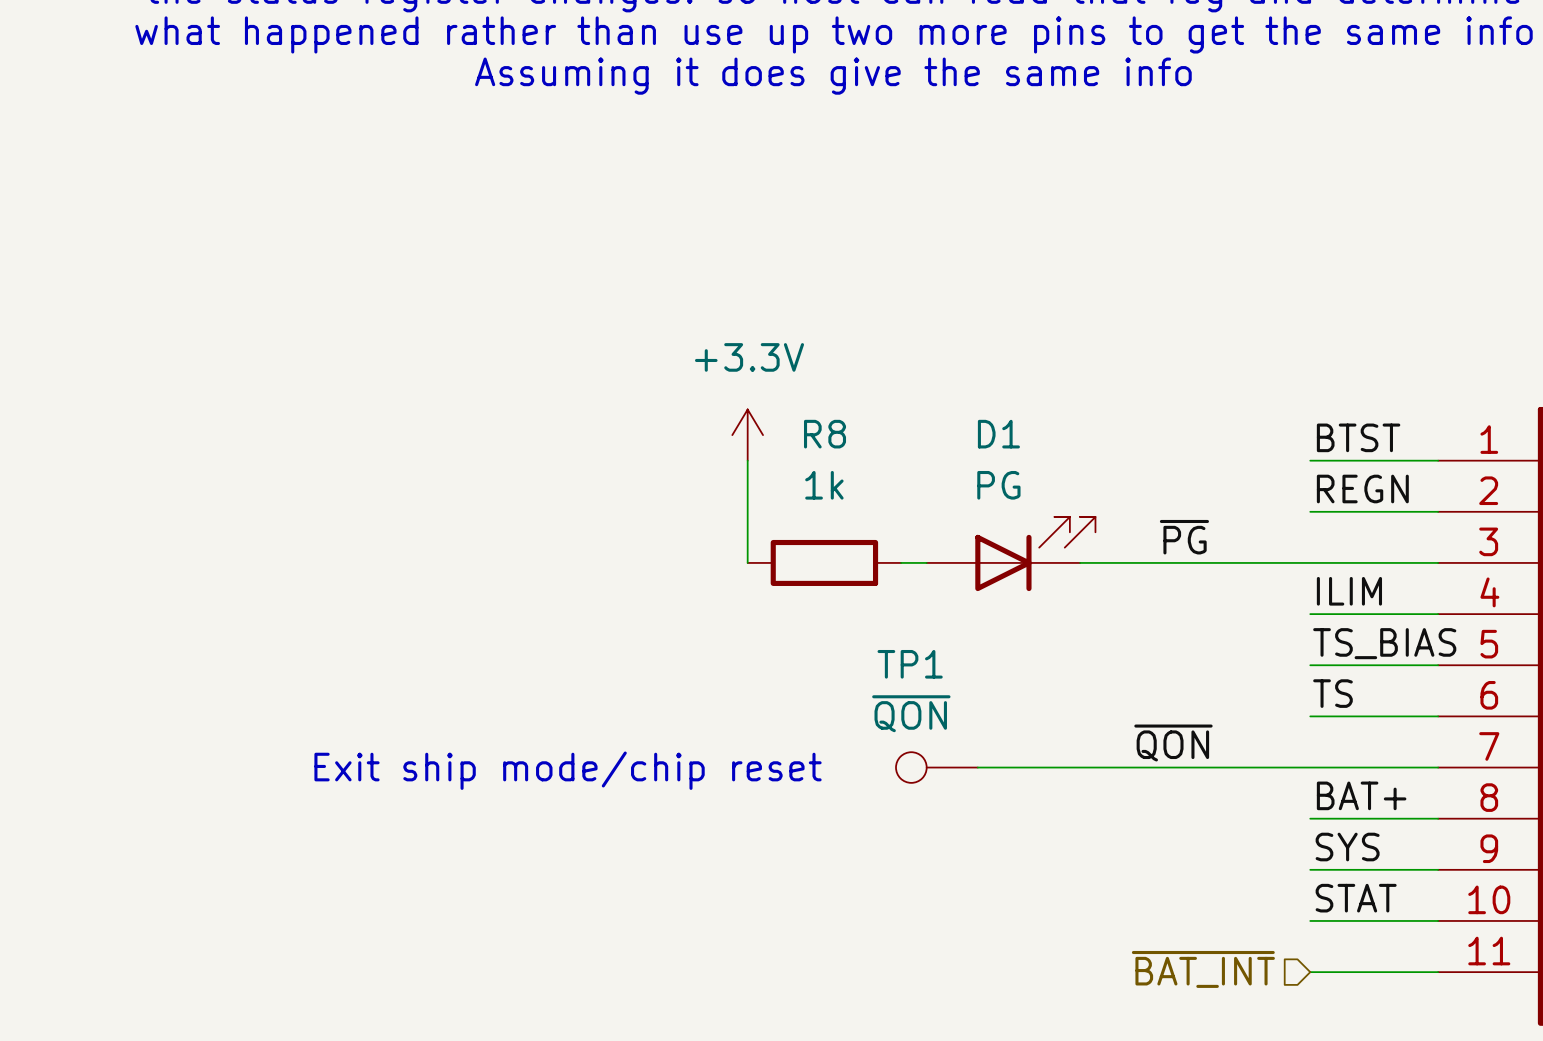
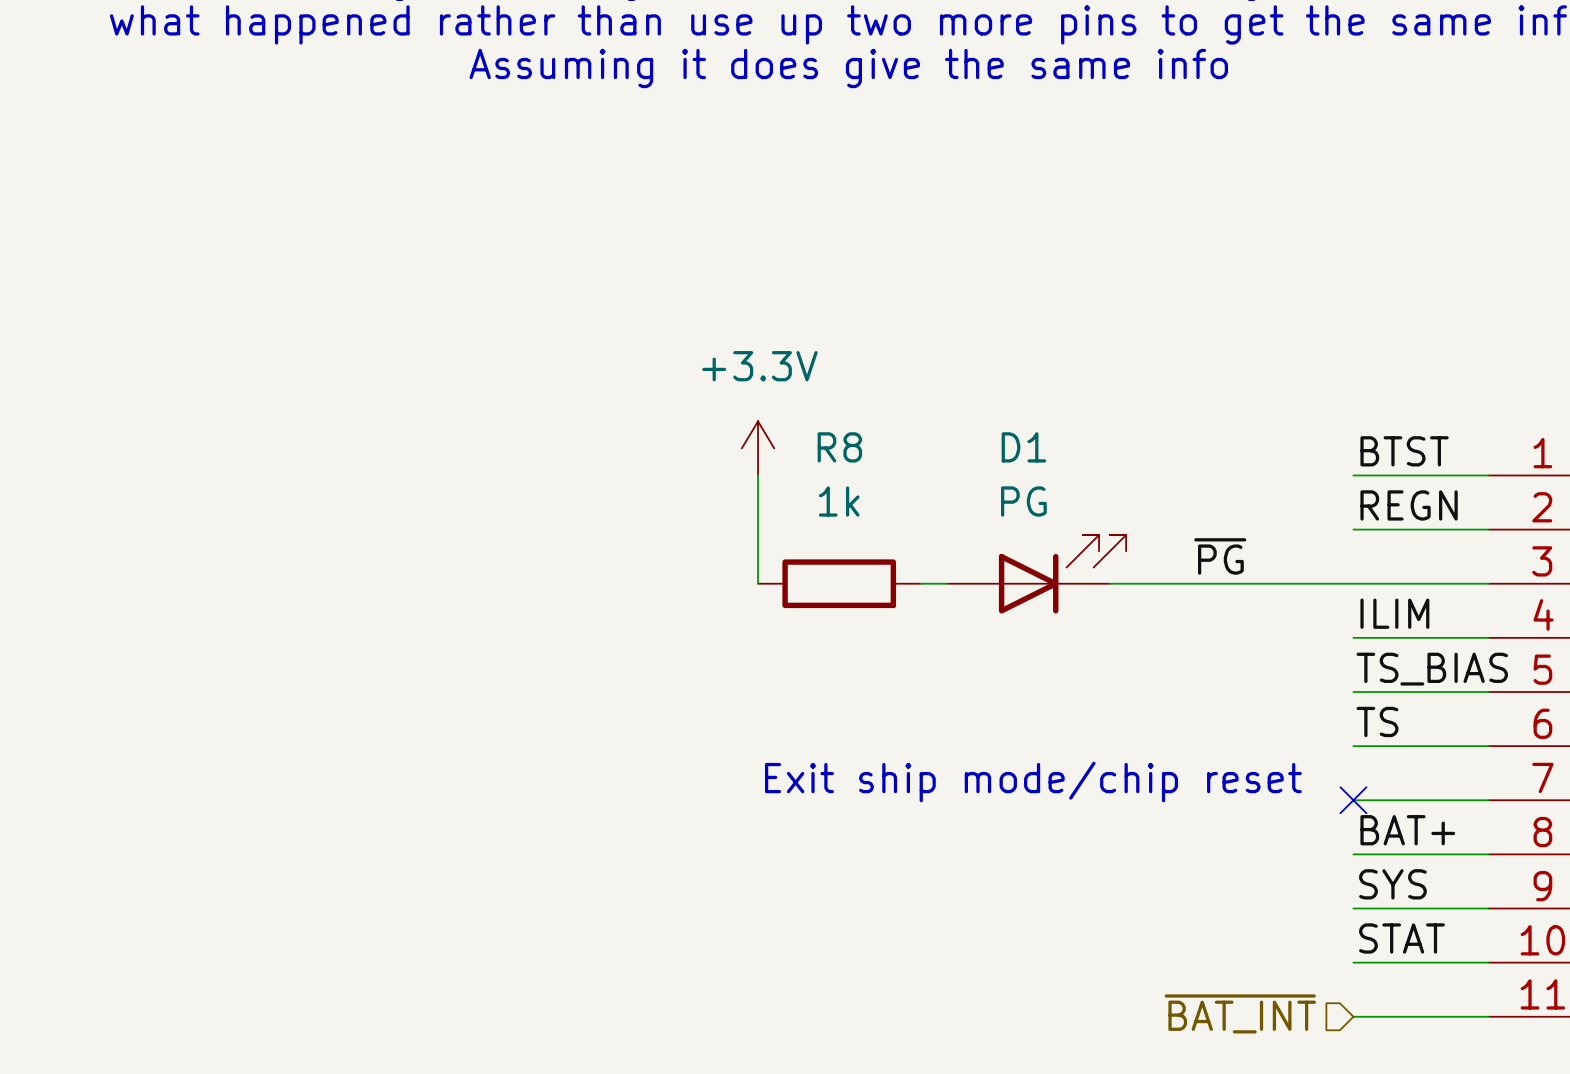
label: ~{QON} (1173, 743) -> none
TP1: ~{QON} (936, 767) -> none
wire: (977, 767) (1310, 767) -> none
no-connect mark: none -> (1353, 800)
text position: Exit ship mode/chip reset (568, 770) -> Exit ship mode/chip reset (1033, 781)

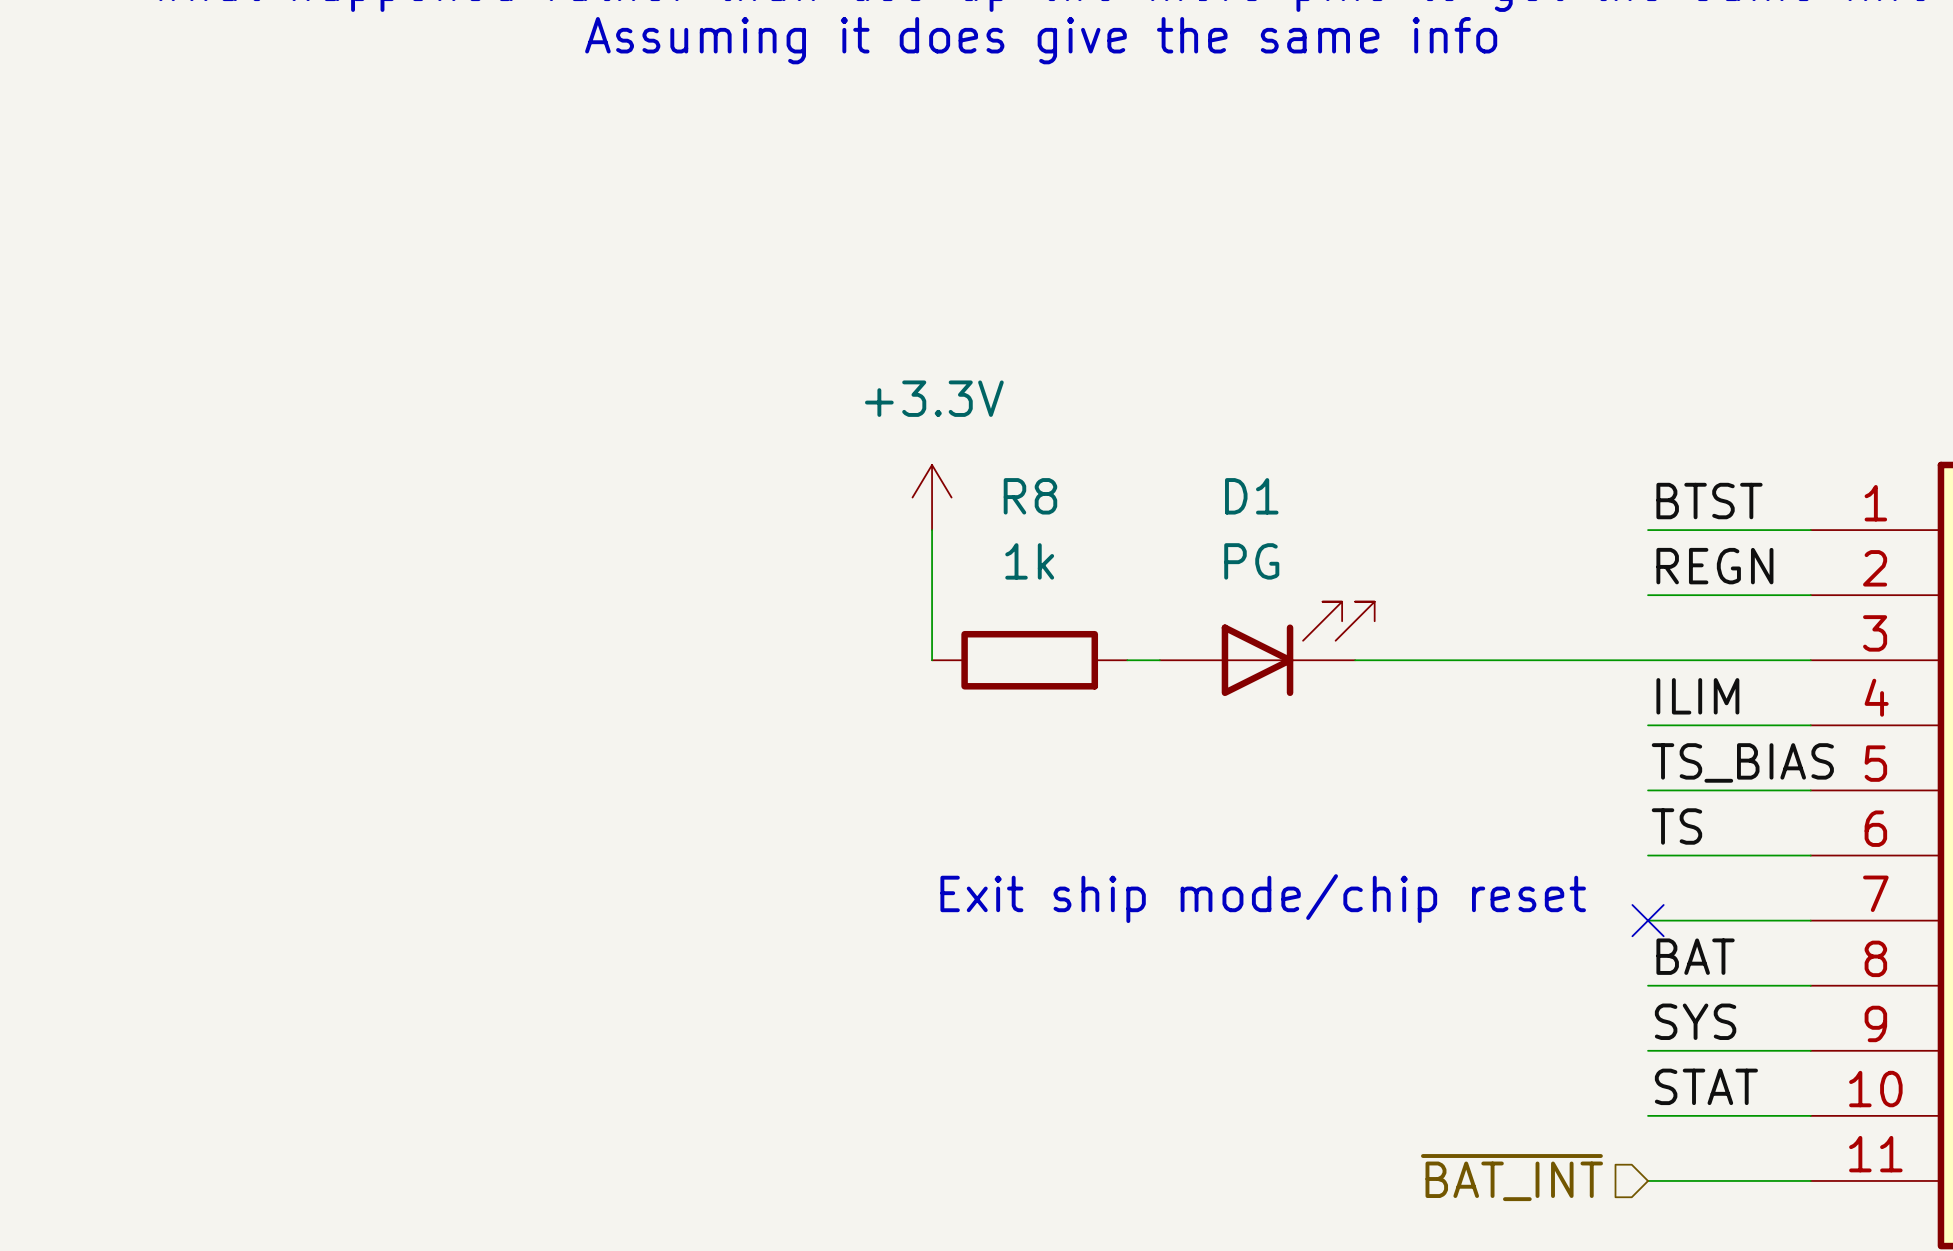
label: ~{PG} (1220, 556) -> none
label: BAT+ (1407, 830) -> BAT (1695, 956)

